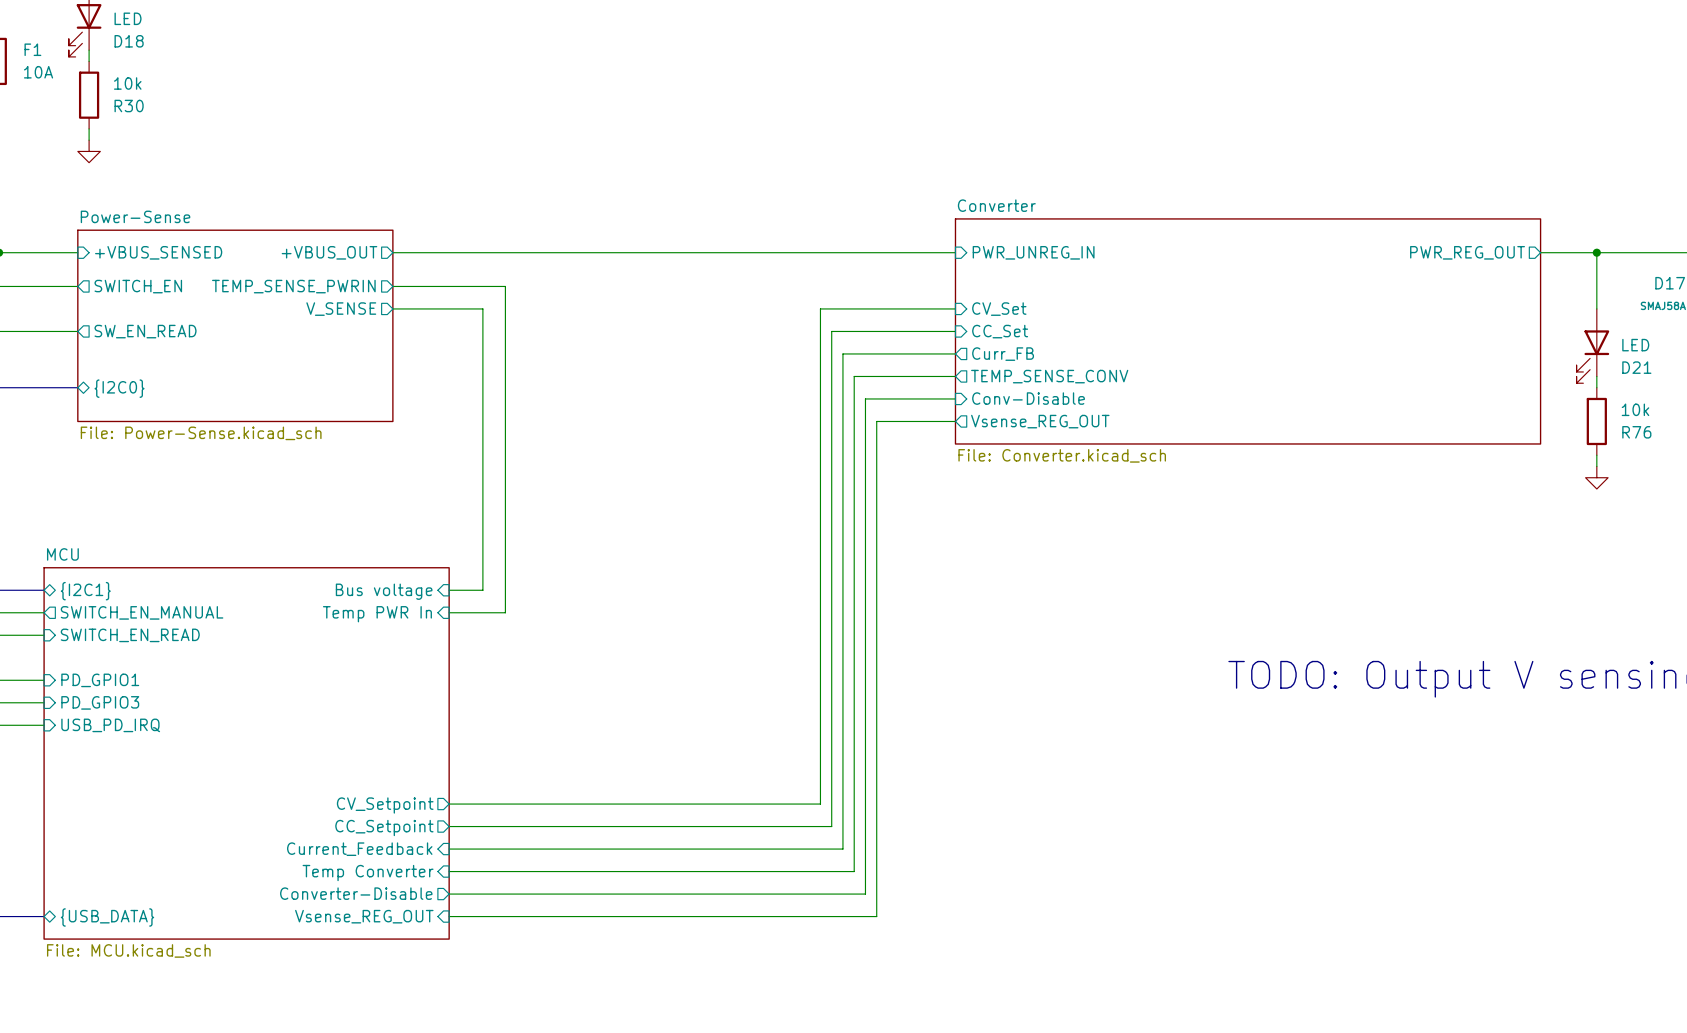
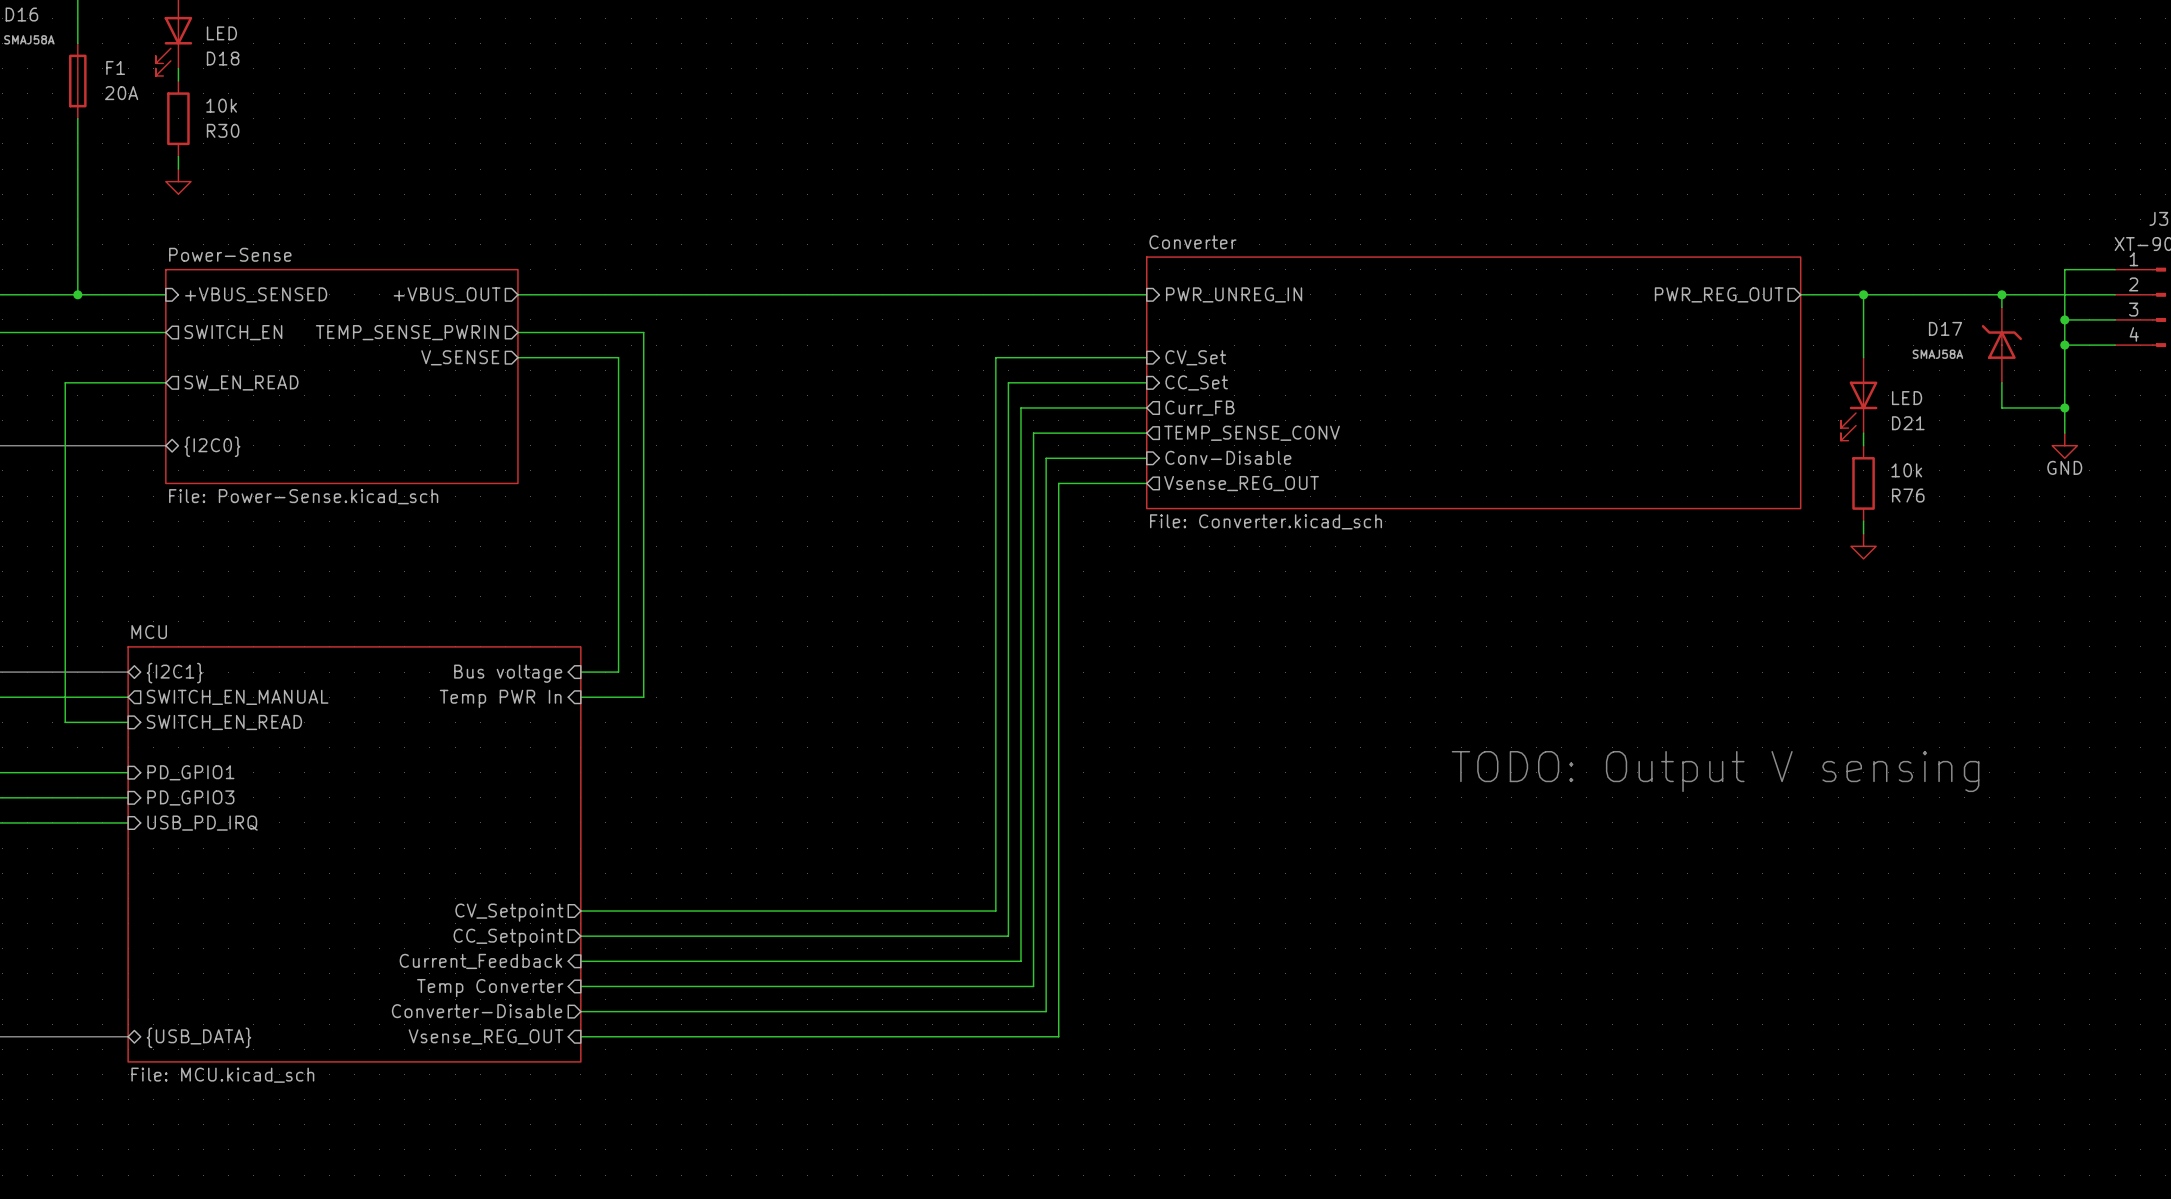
F1 value: 10A (38, 72) -> 20A (121, 93)

